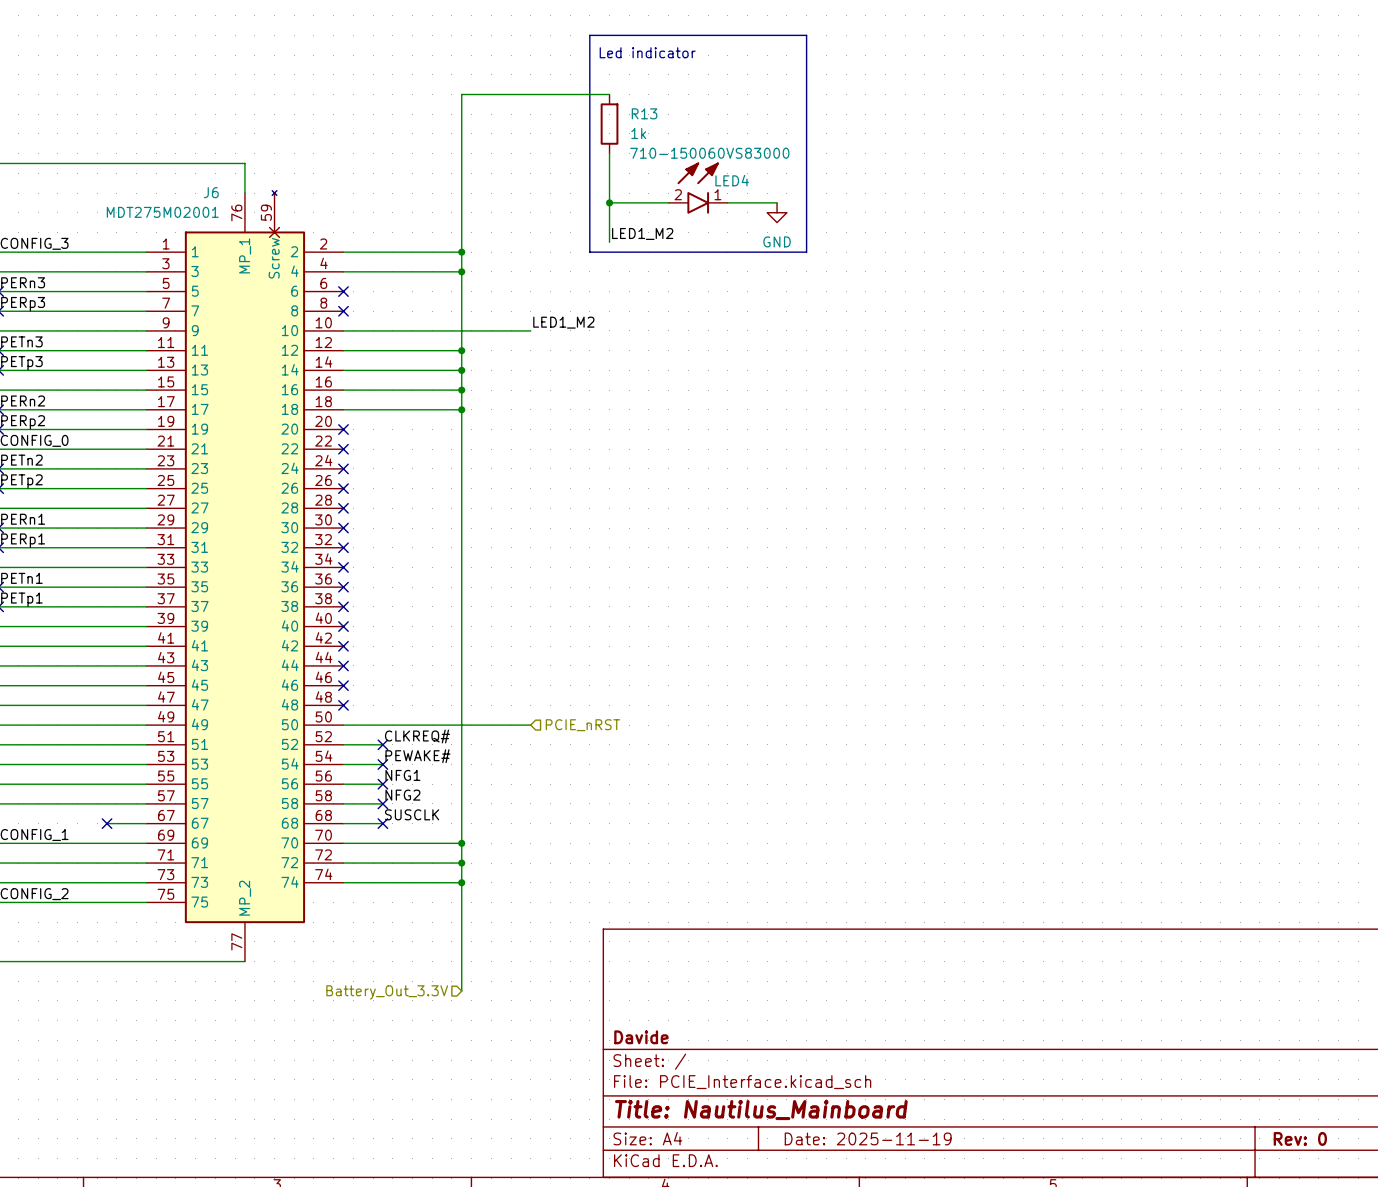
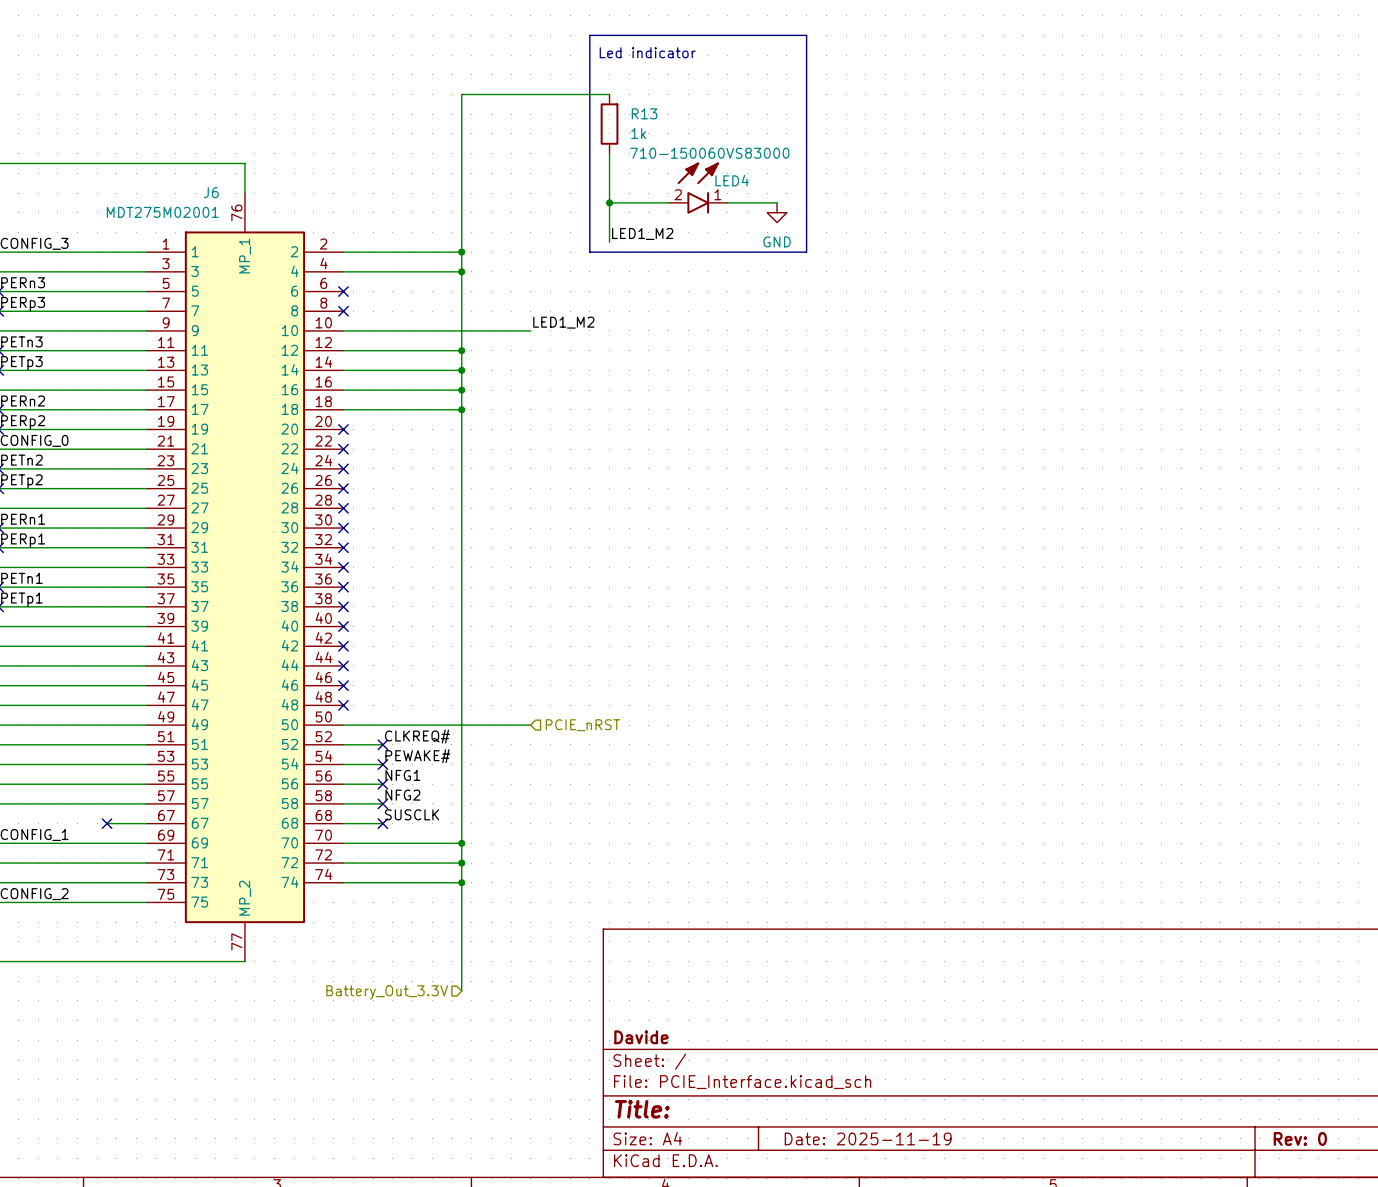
J6 symbol: [146, 190, 344, 962] -> [146, 193, 344, 962]
title block: Title: Nautilus_Mainboard (761, 1110) -> Title: (642, 1109)

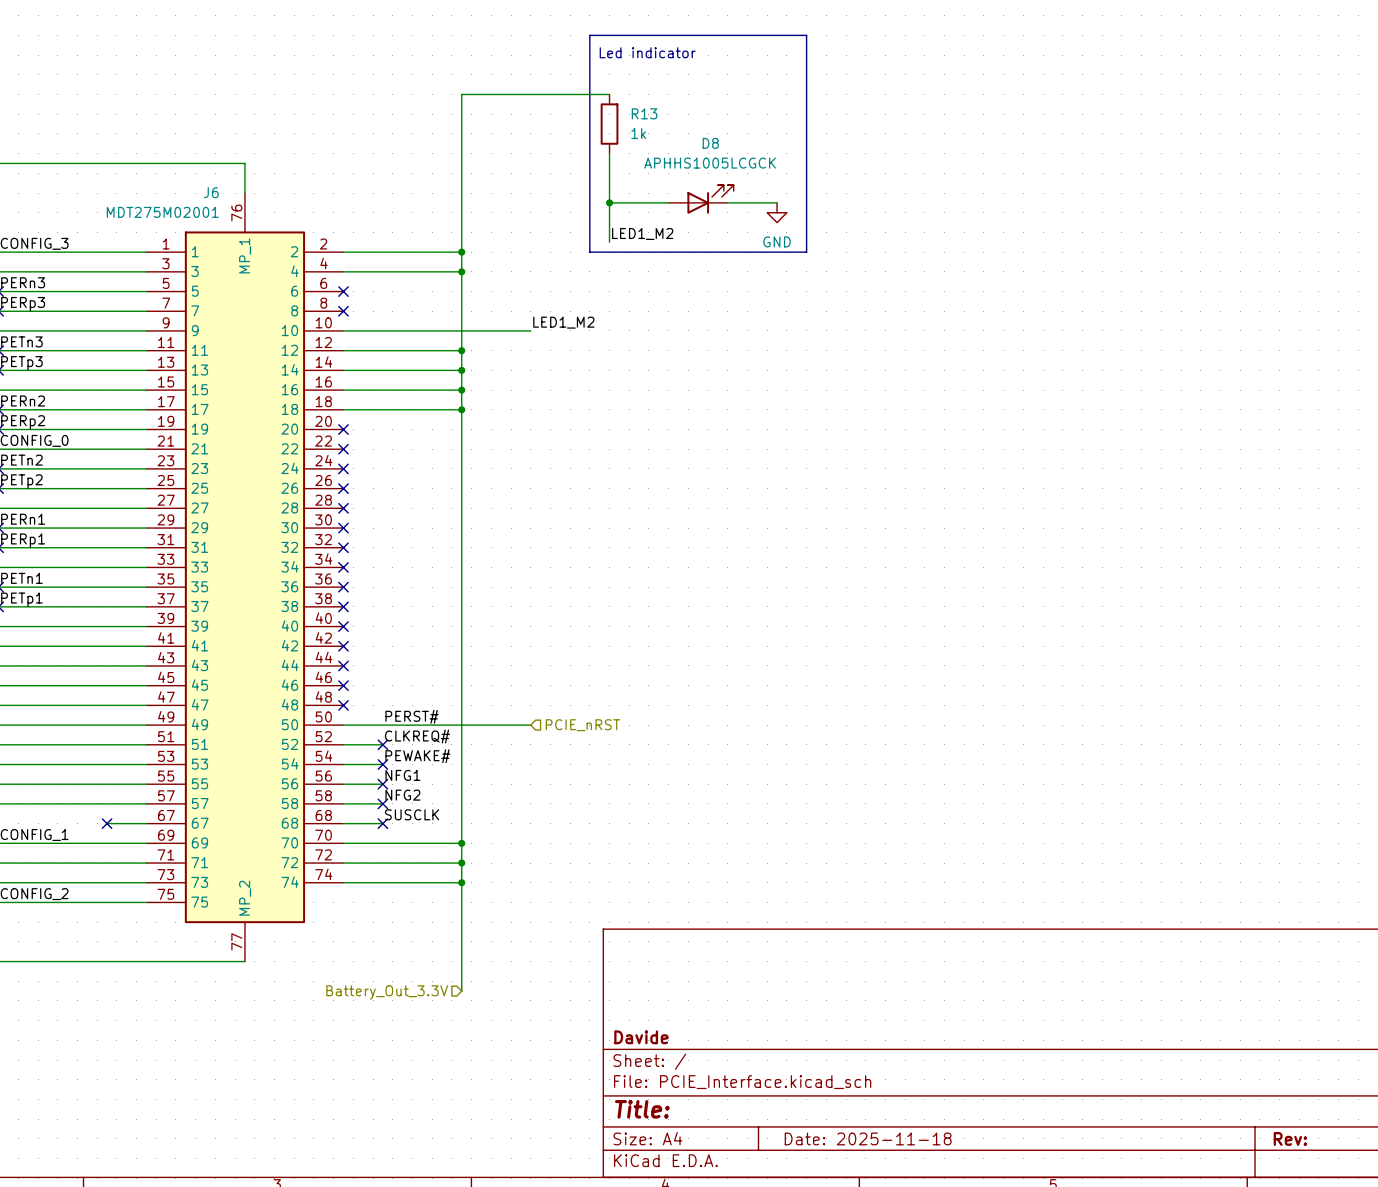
LED4: 710-150060VS83000 (698, 188) -> none
D8: none -> APHHS1005LCGCK (701, 199)
label: none -> PERST# (412, 716)
title block: Date: 2025-11-19 (868, 1138) -> Date: 2025-11-18 (868, 1138)
title block: Rev: 0 (1300, 1138) -> Rev: (1290, 1138)

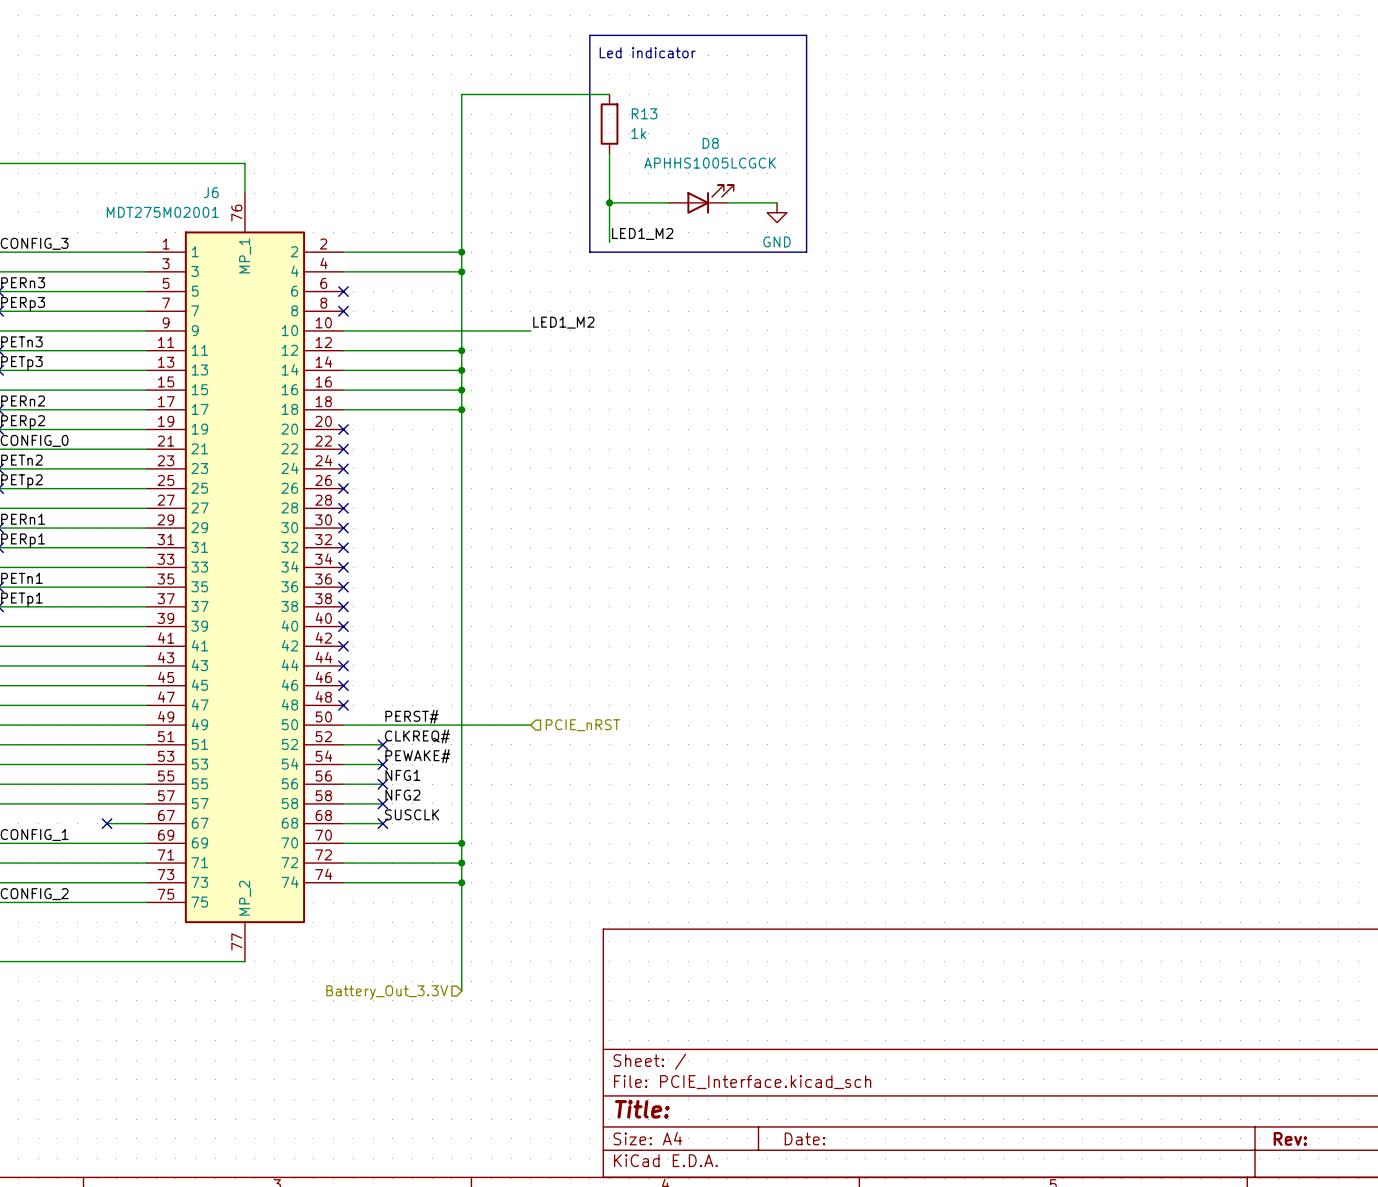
title block: Davide (641, 1037) -> none
title block: Date: 2025-11-18 (868, 1138) -> Date: (804, 1138)

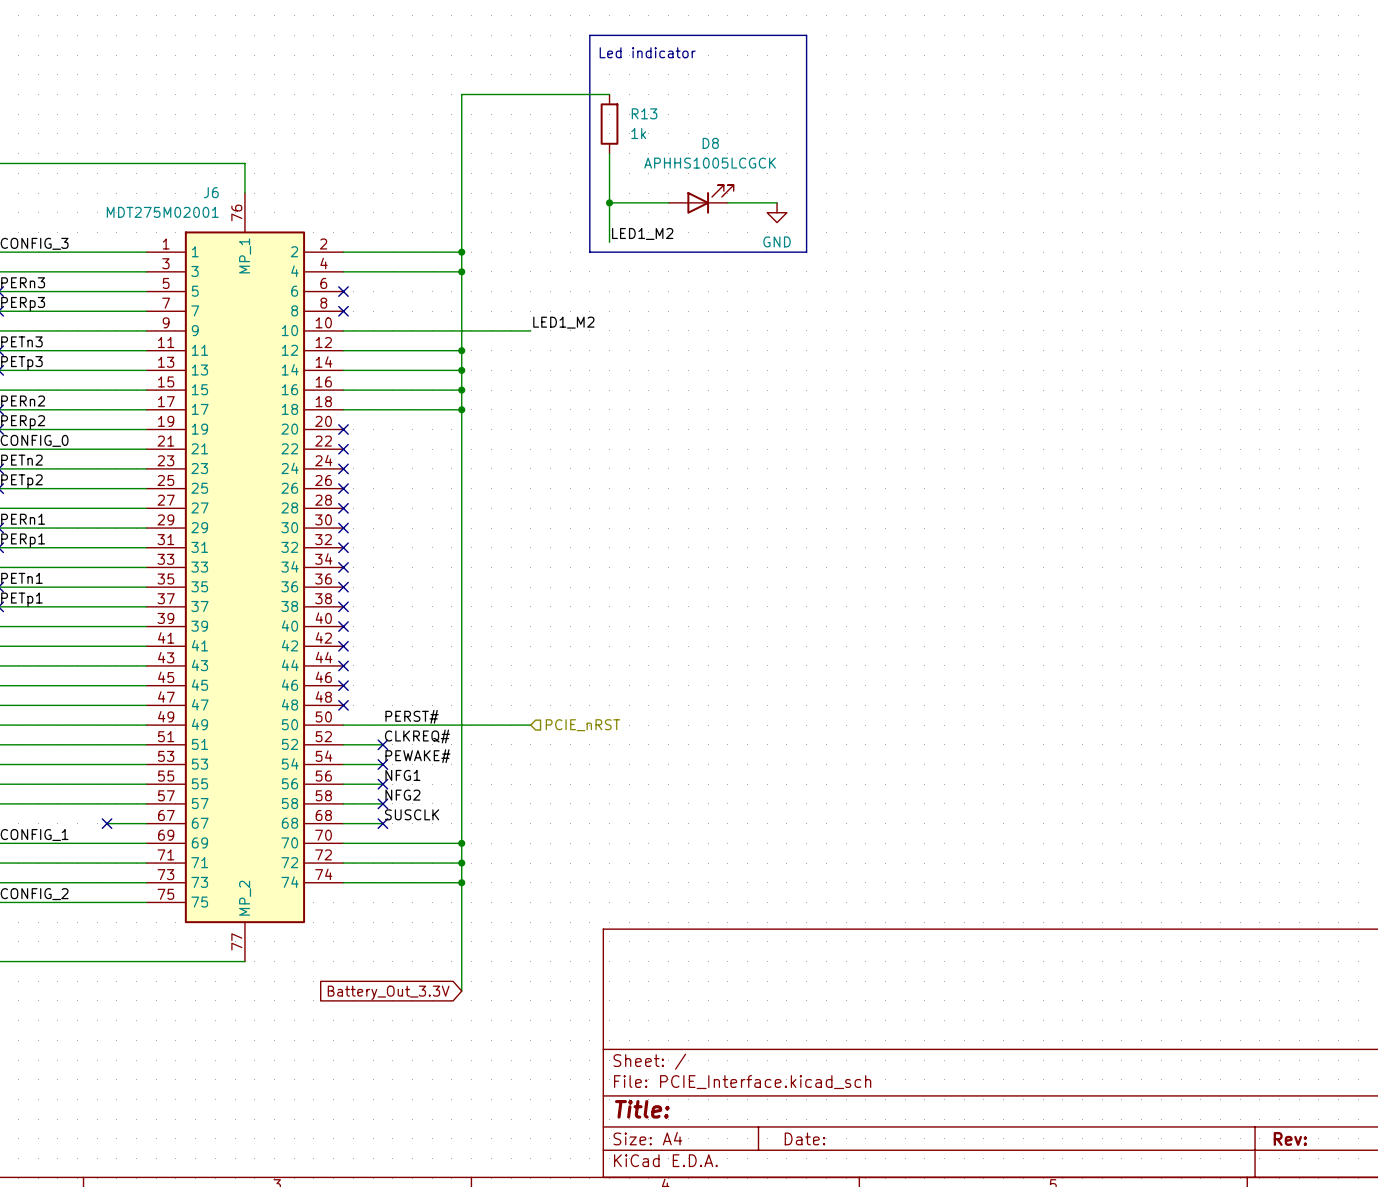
hierarchical label: Battery_Out_3.3V (387, 992) -> none
global label: none -> Battery_Out_3.3V (388, 992)

